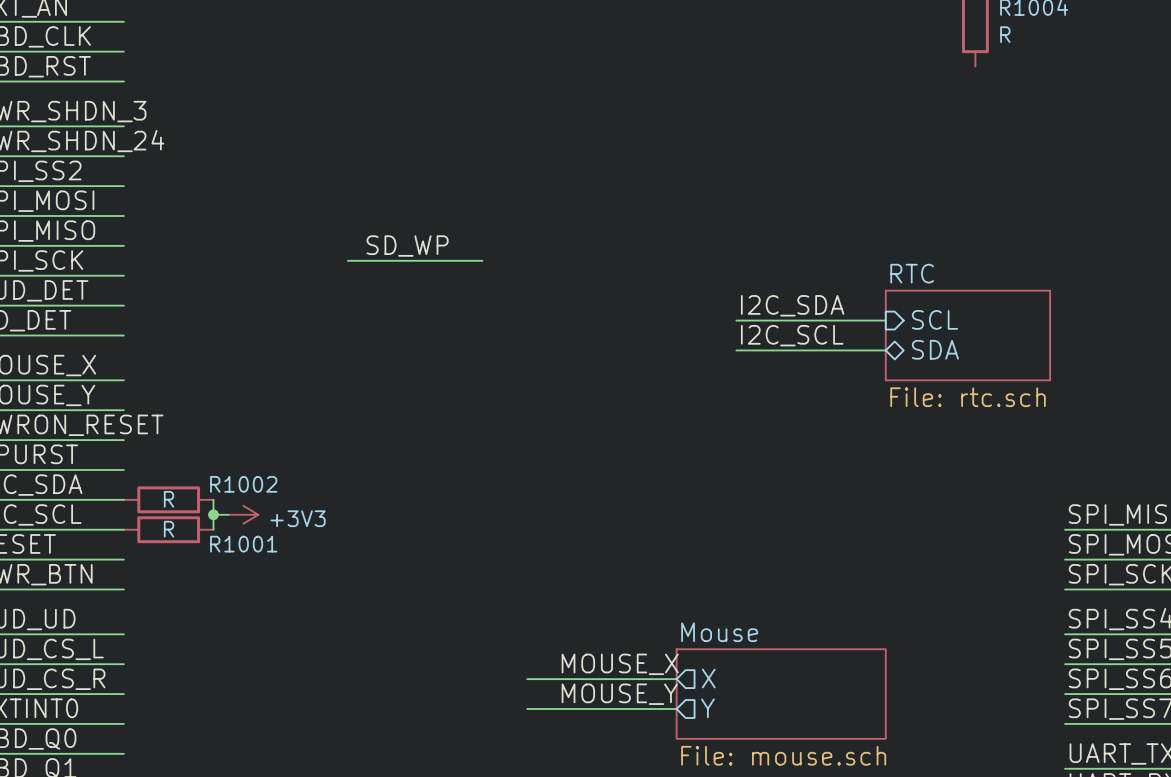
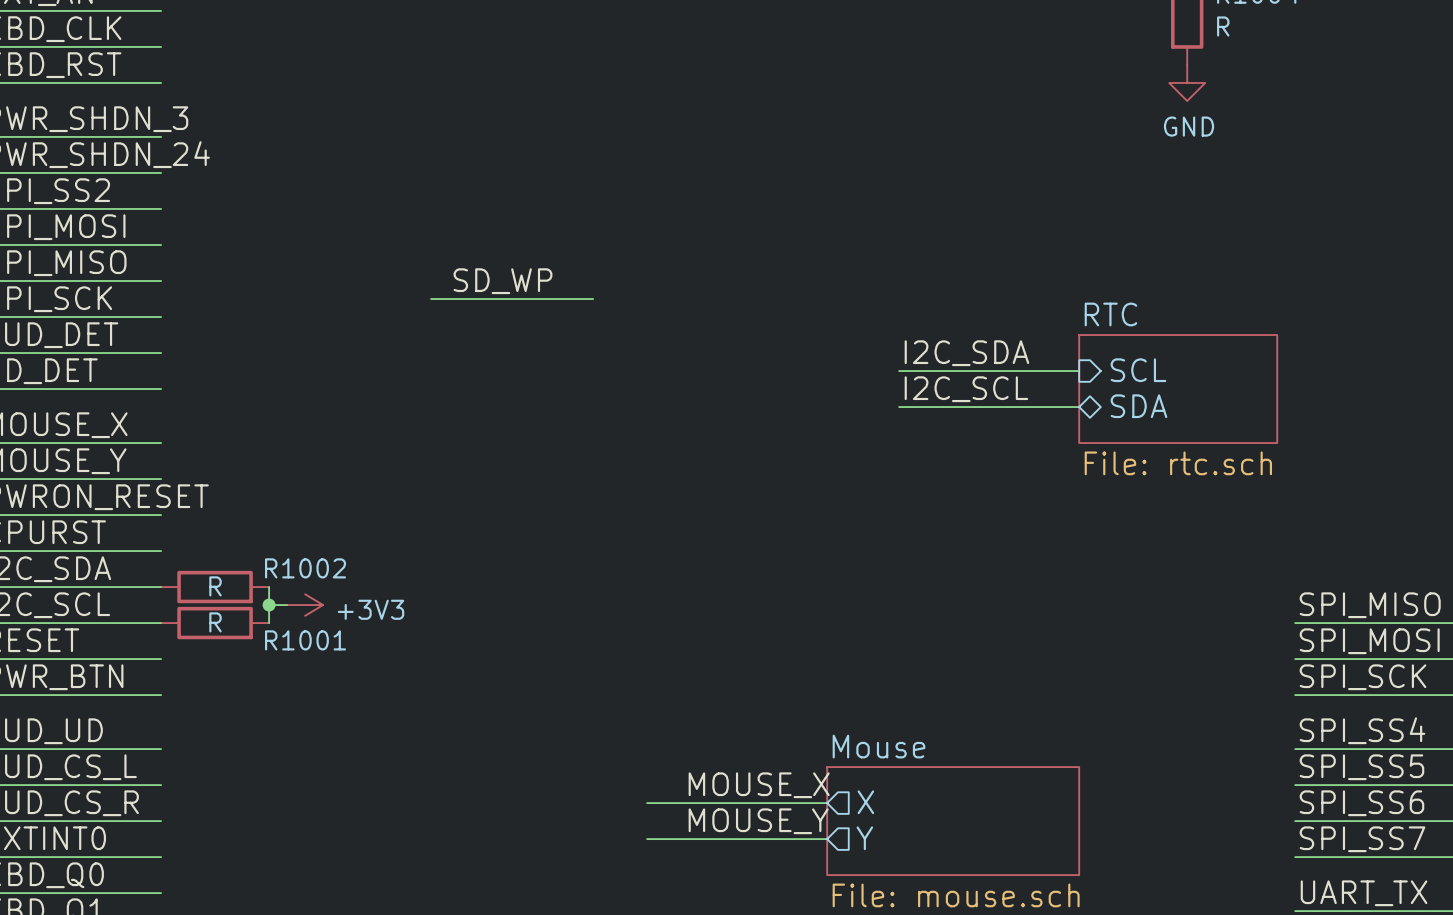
power symbol: none -> GND (1187, 82)

